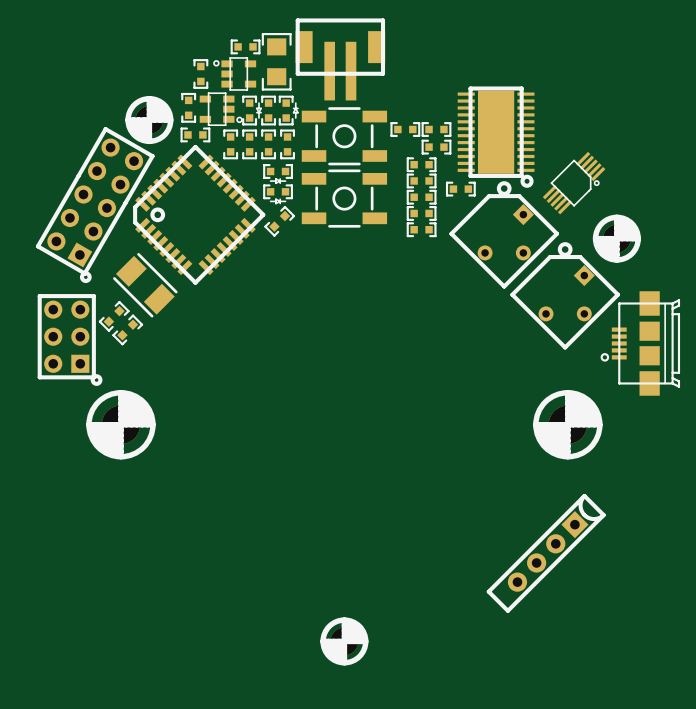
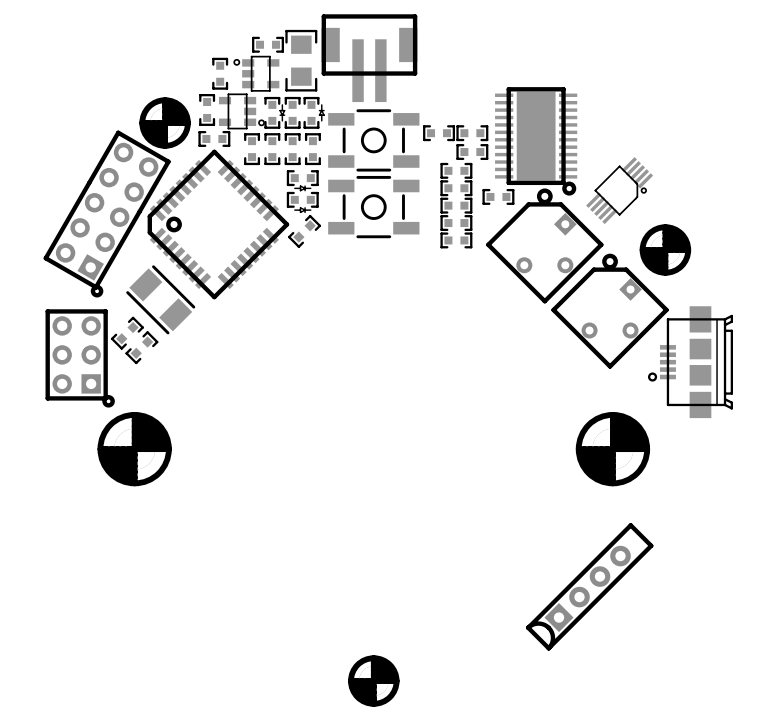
part rotation: 0° (546, 553) -> 180° (589, 586)

